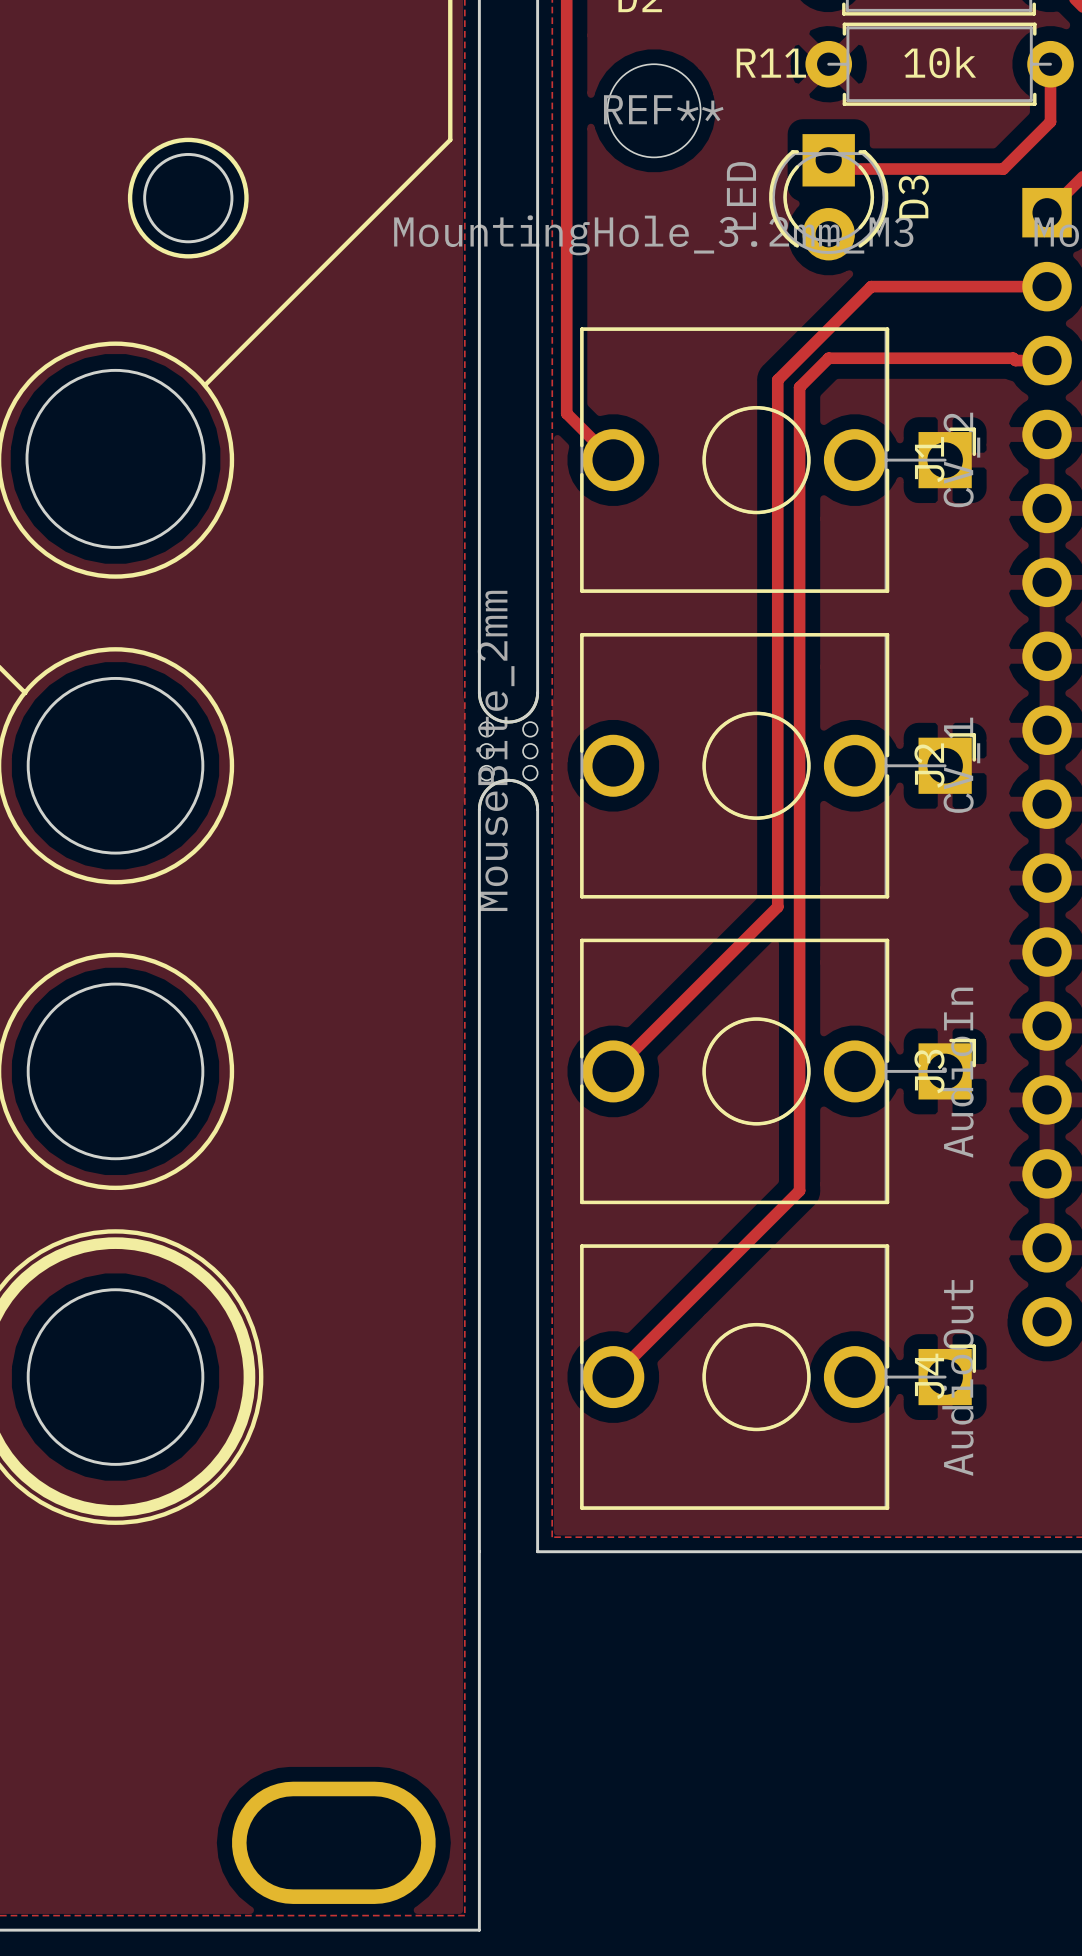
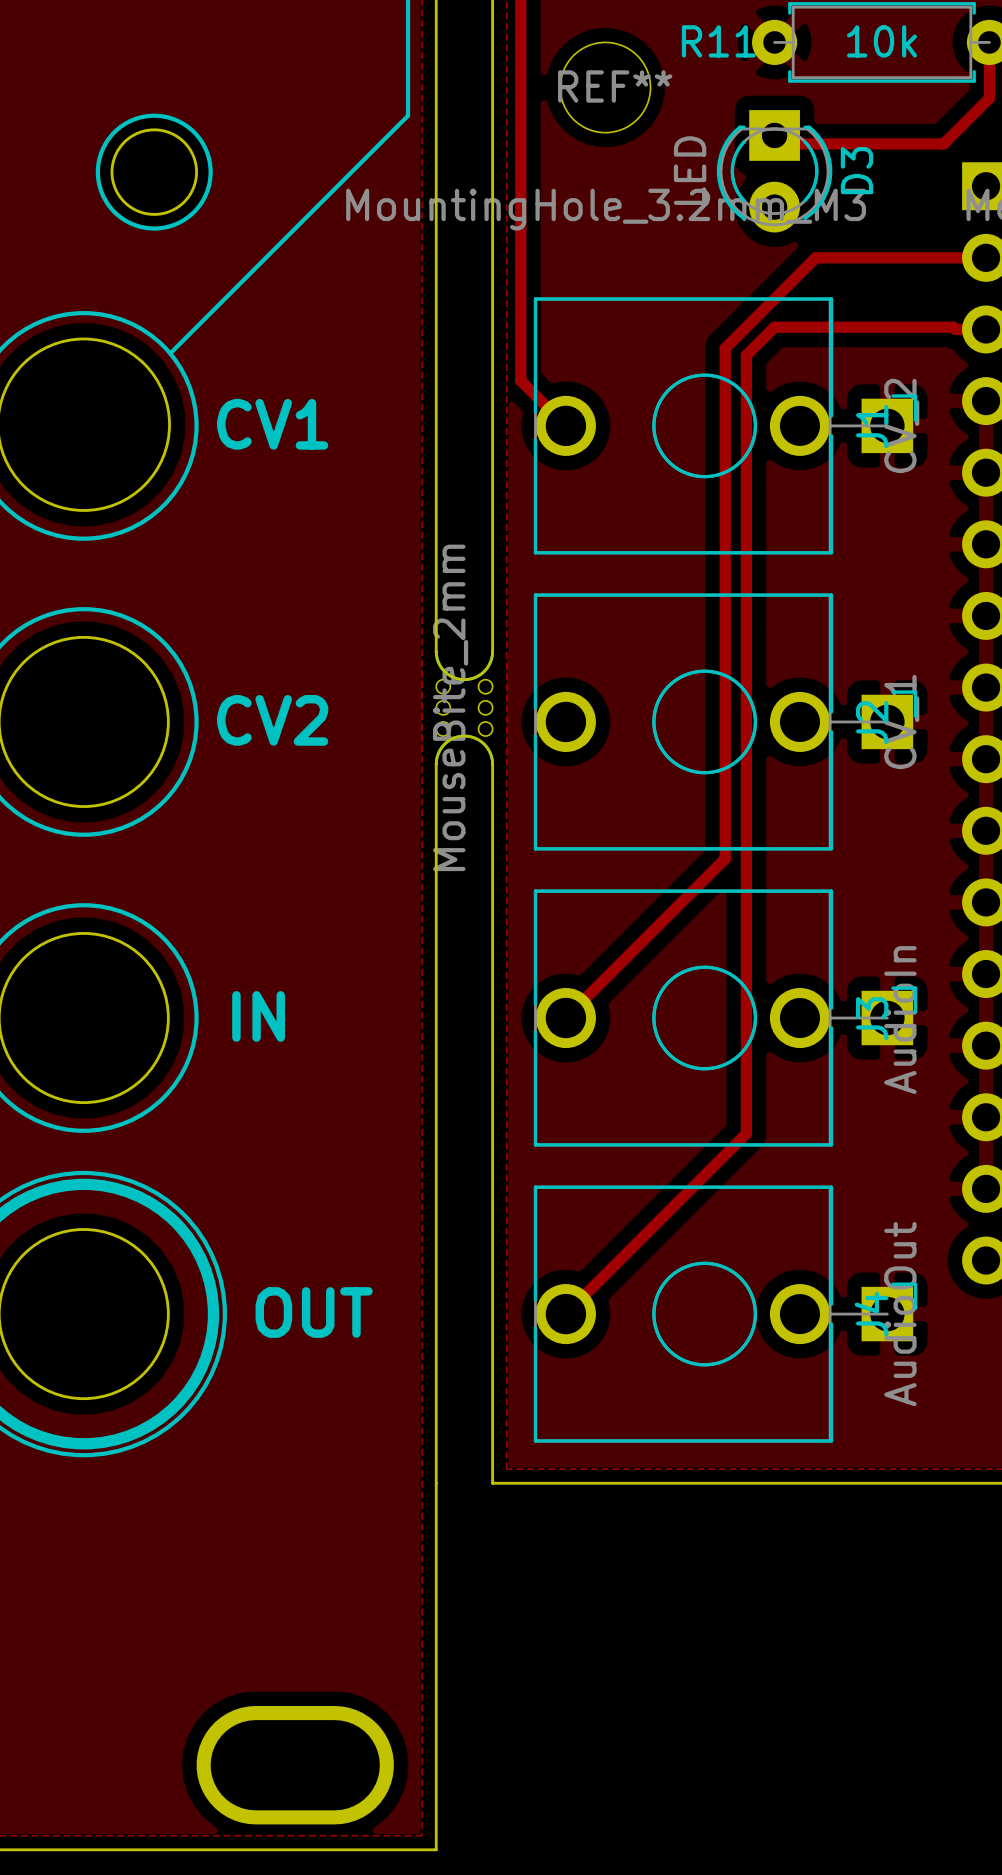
text: none -> CV1 (272, 424)
text: none -> CV2 (272, 720)
text: none -> IN (258, 1016)
text: none -> OUT (314, 1312)

